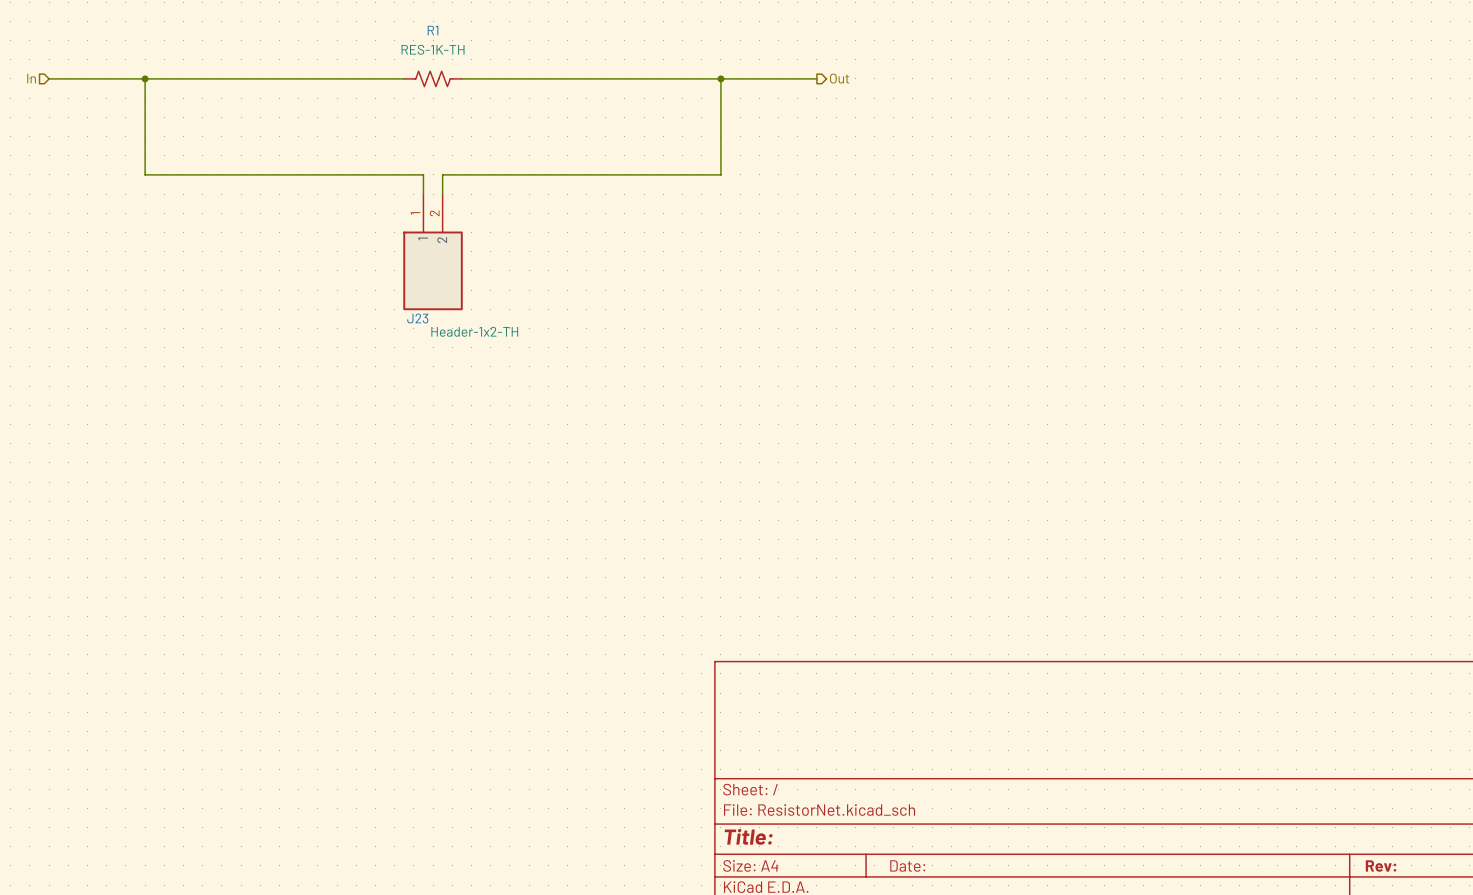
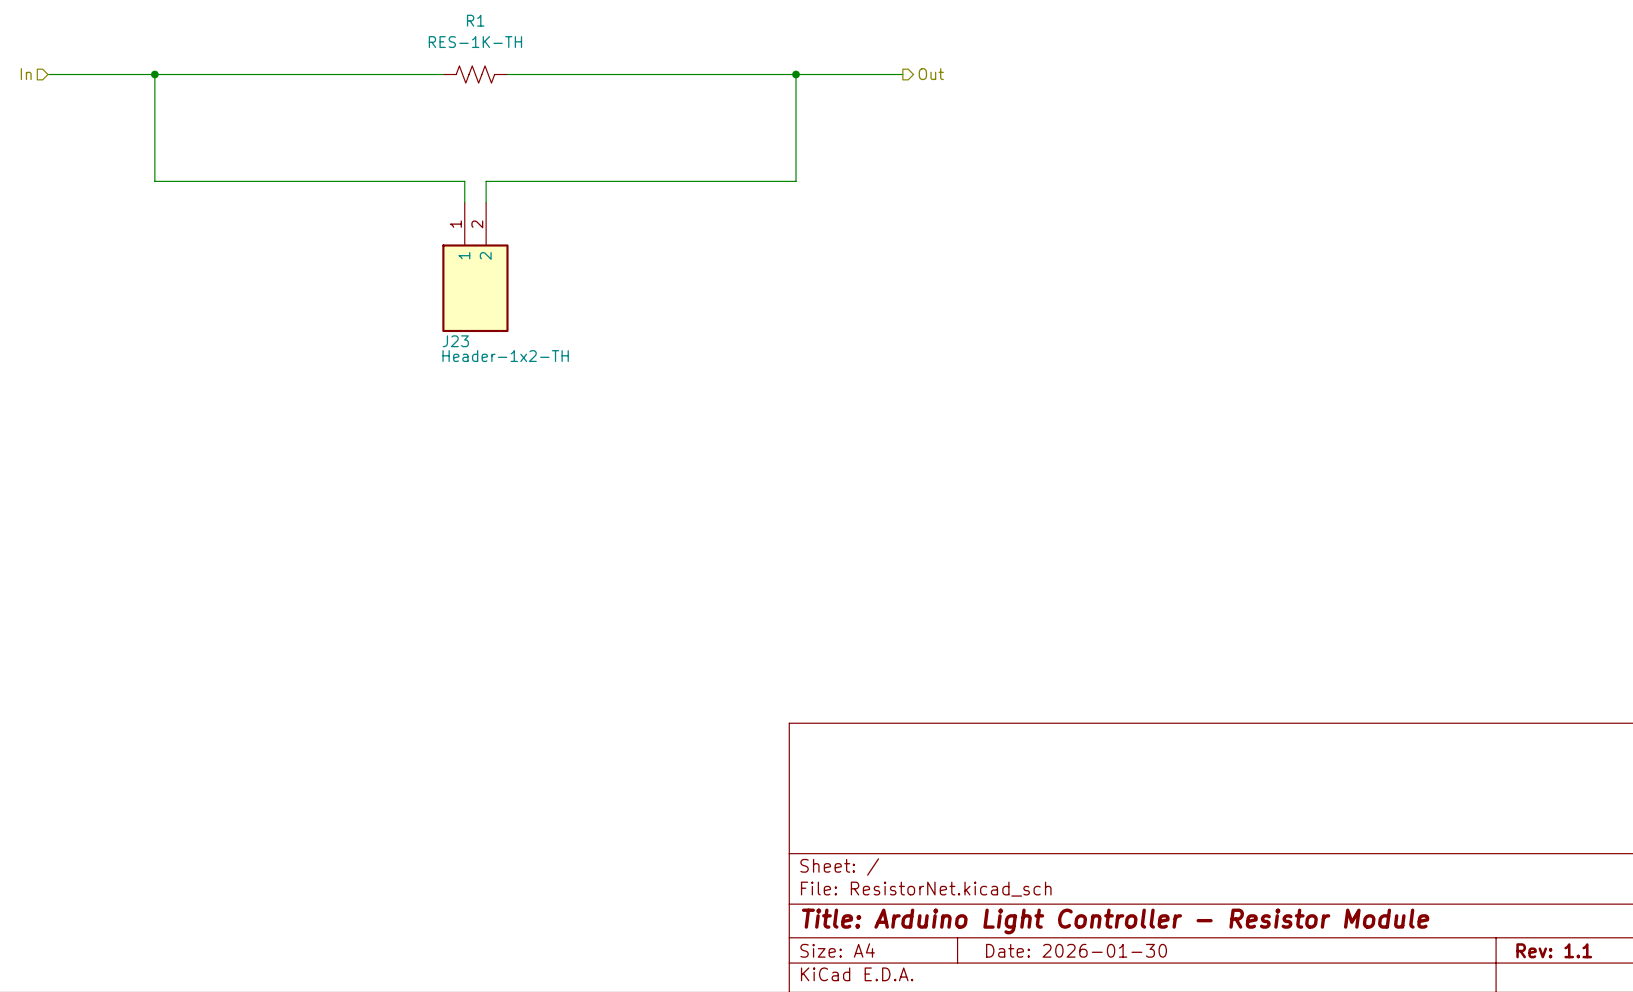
title block: Title: (748, 836) -> Title: Arduino Light Controller - Resistor Module (1115, 921)
title block: Date: (907, 866) -> Date: 2026-01-30 (1076, 950)
title block: Rev: (1381, 866) -> Rev: 1.1 (1554, 950)

